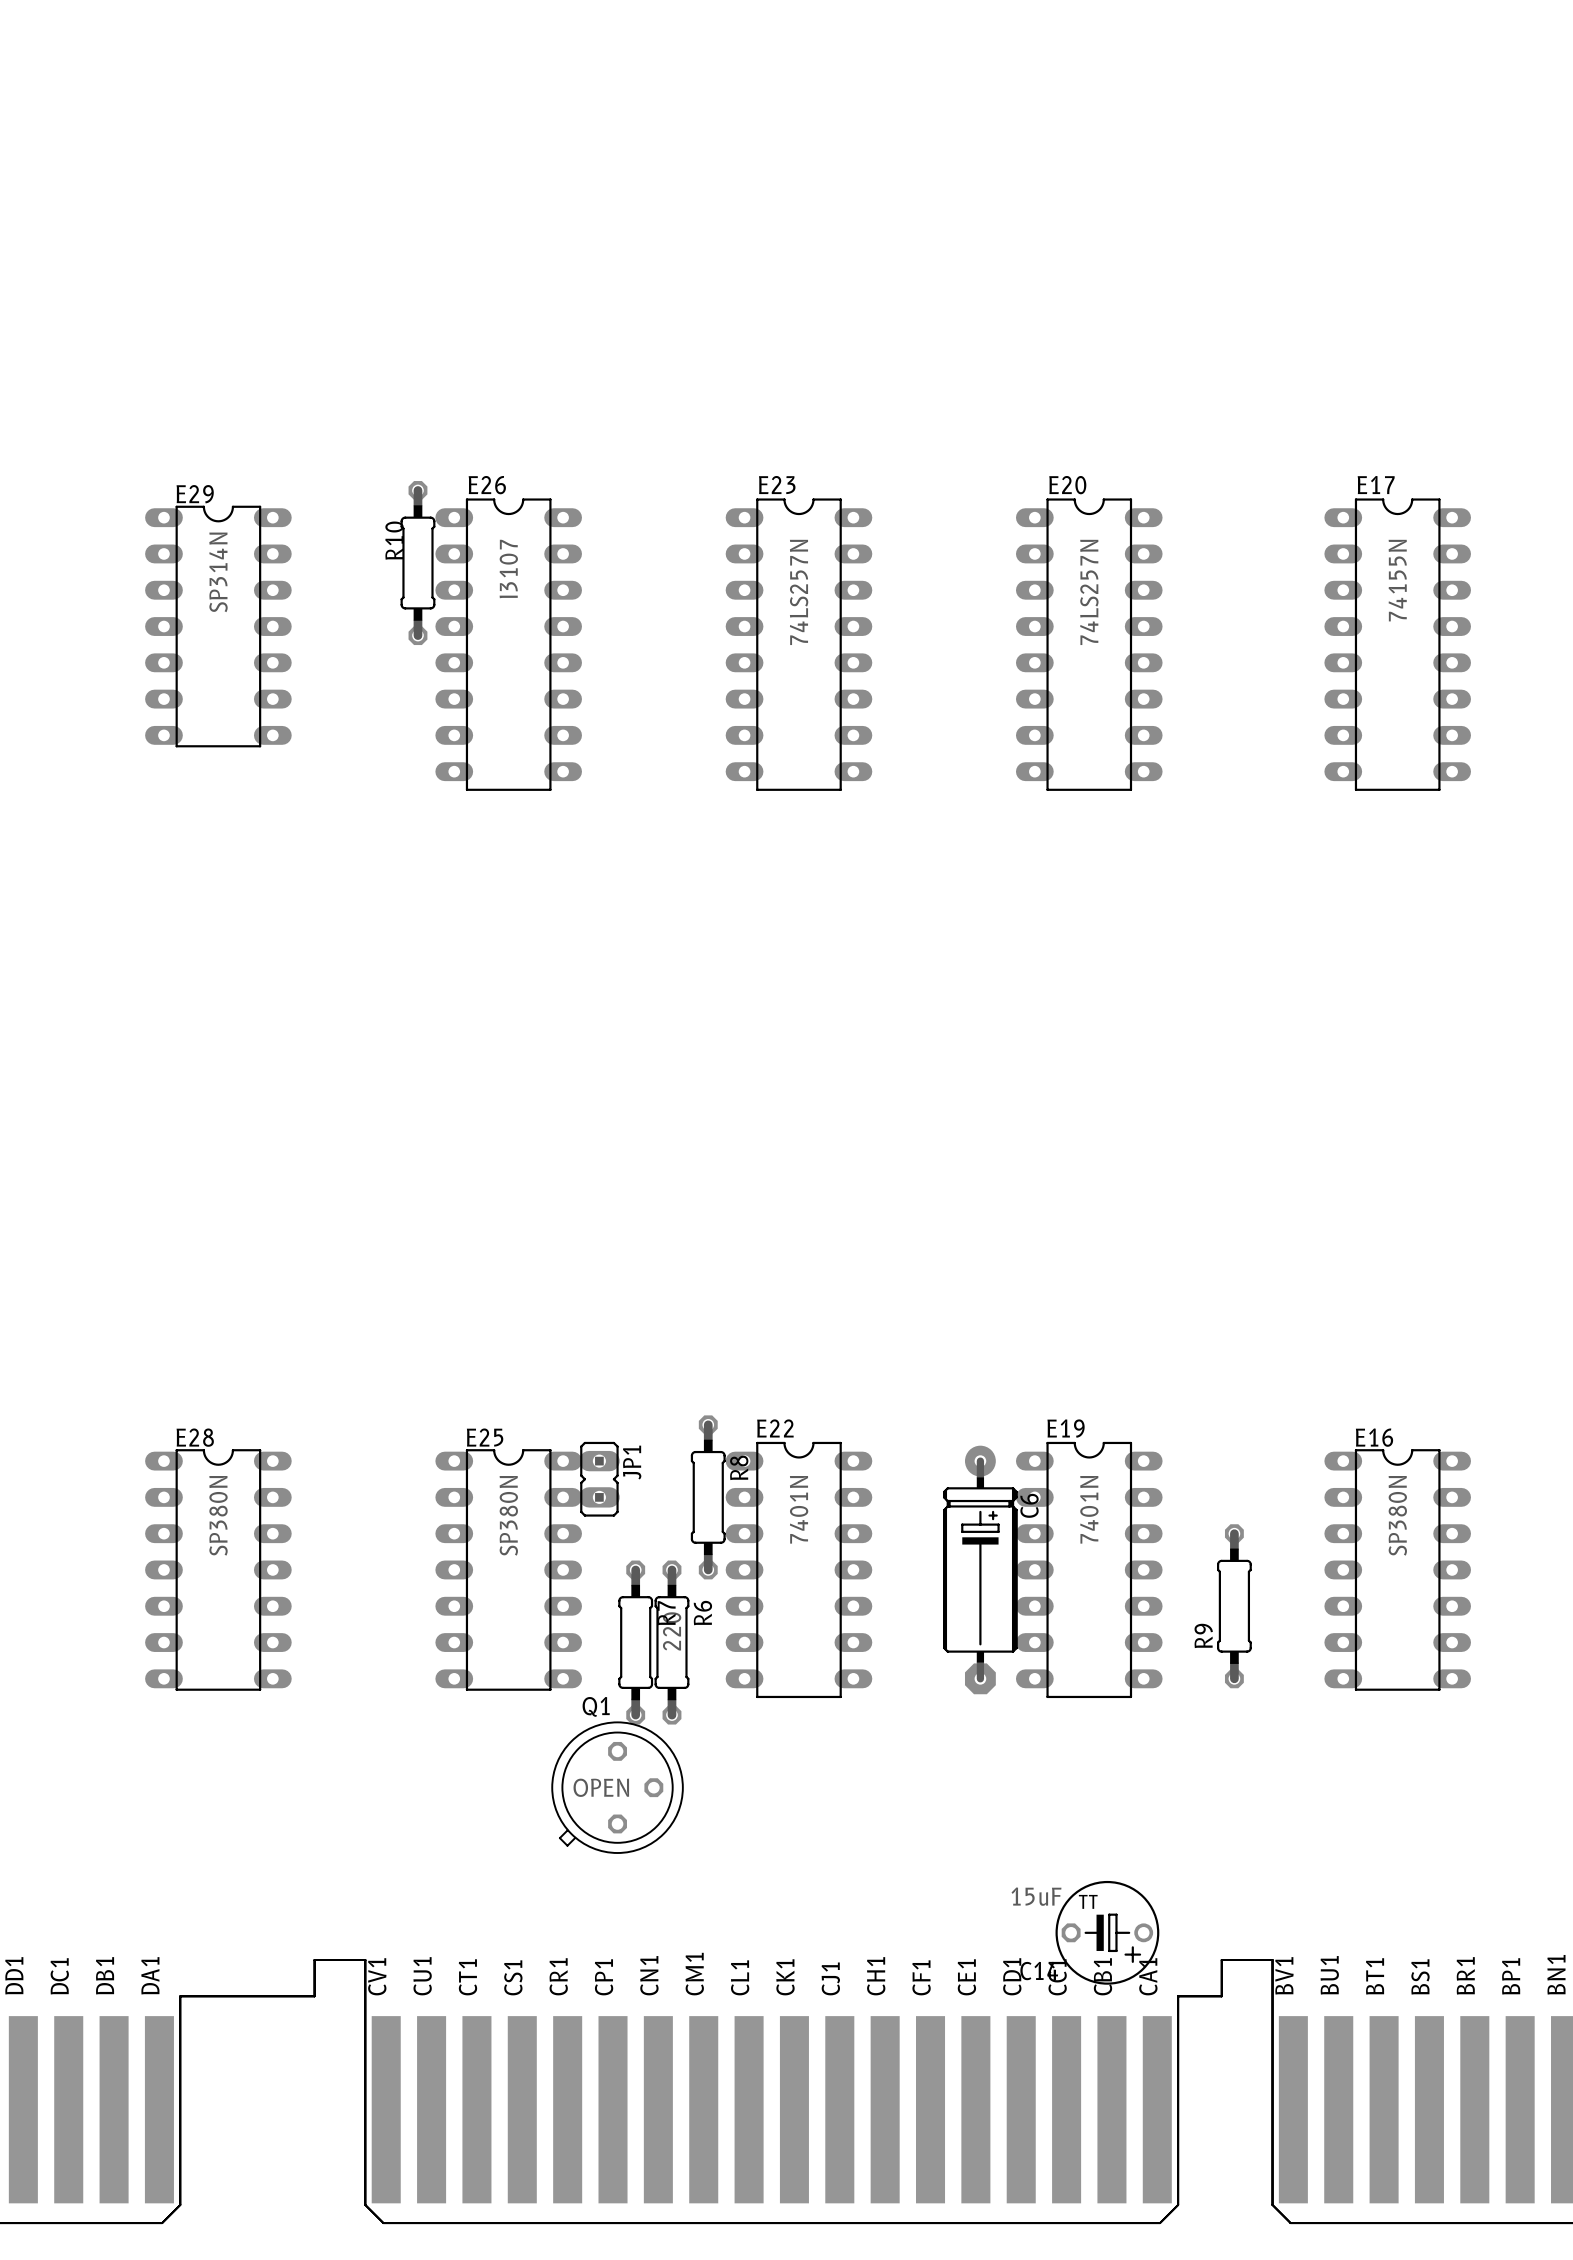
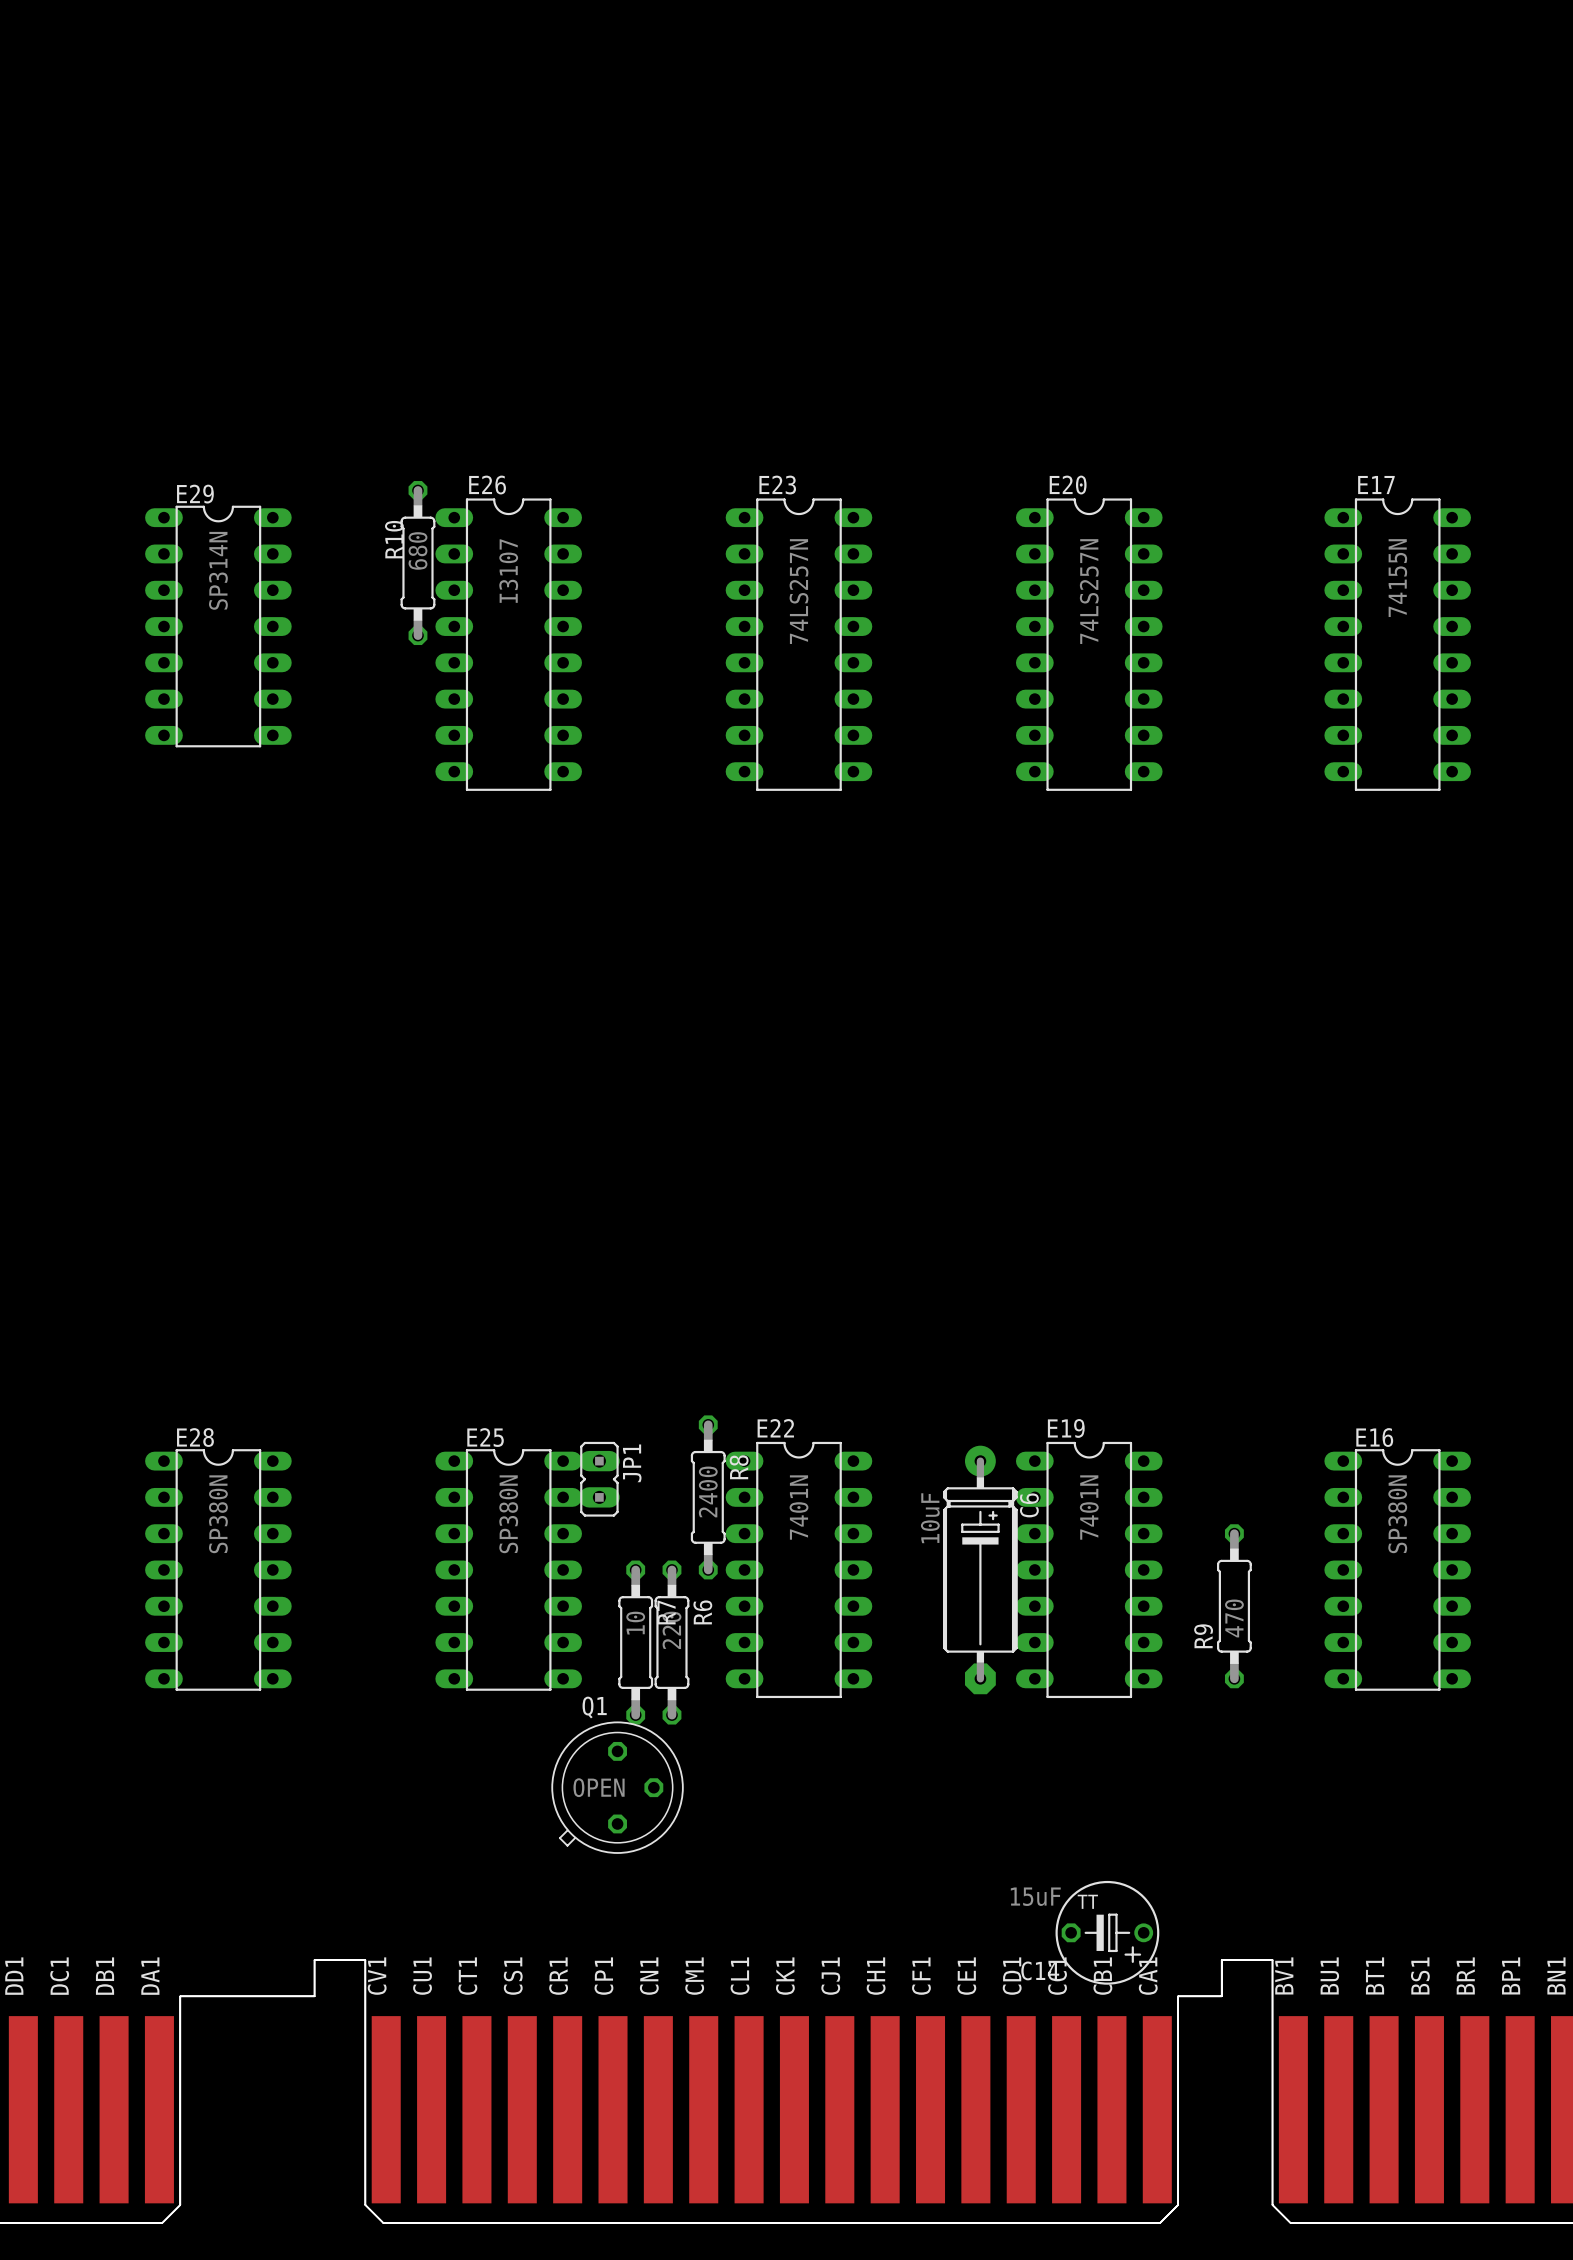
R10 value: none -> 680 (417, 550)
R8 value: none -> 2400 (708, 1491)
C6 value: none -> 10uF (930, 1518)
R9 value: none -> 470 (1234, 1618)
R7 value: none -> 10 (635, 1623)

